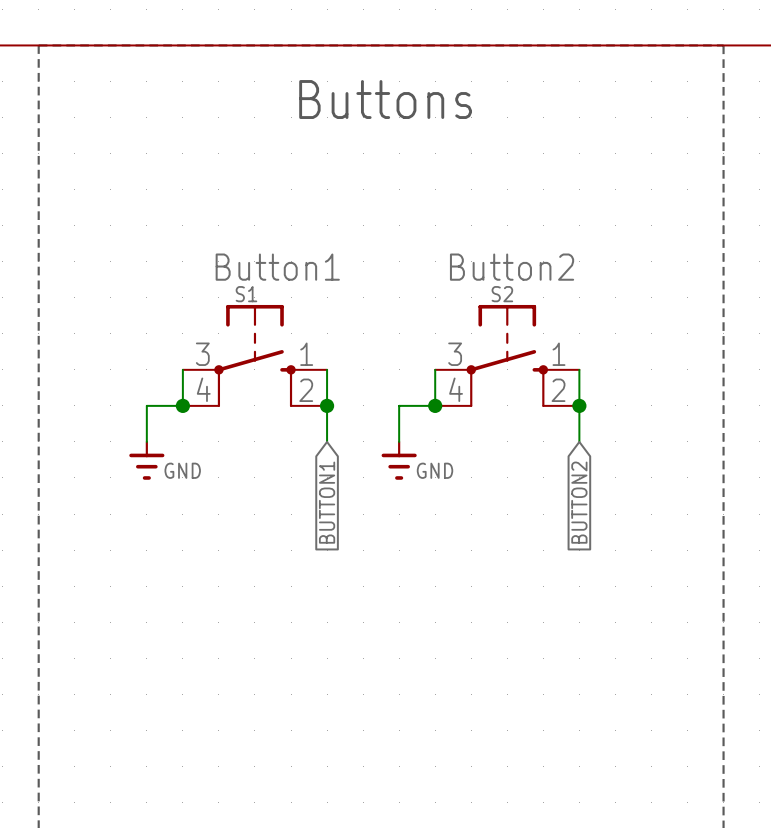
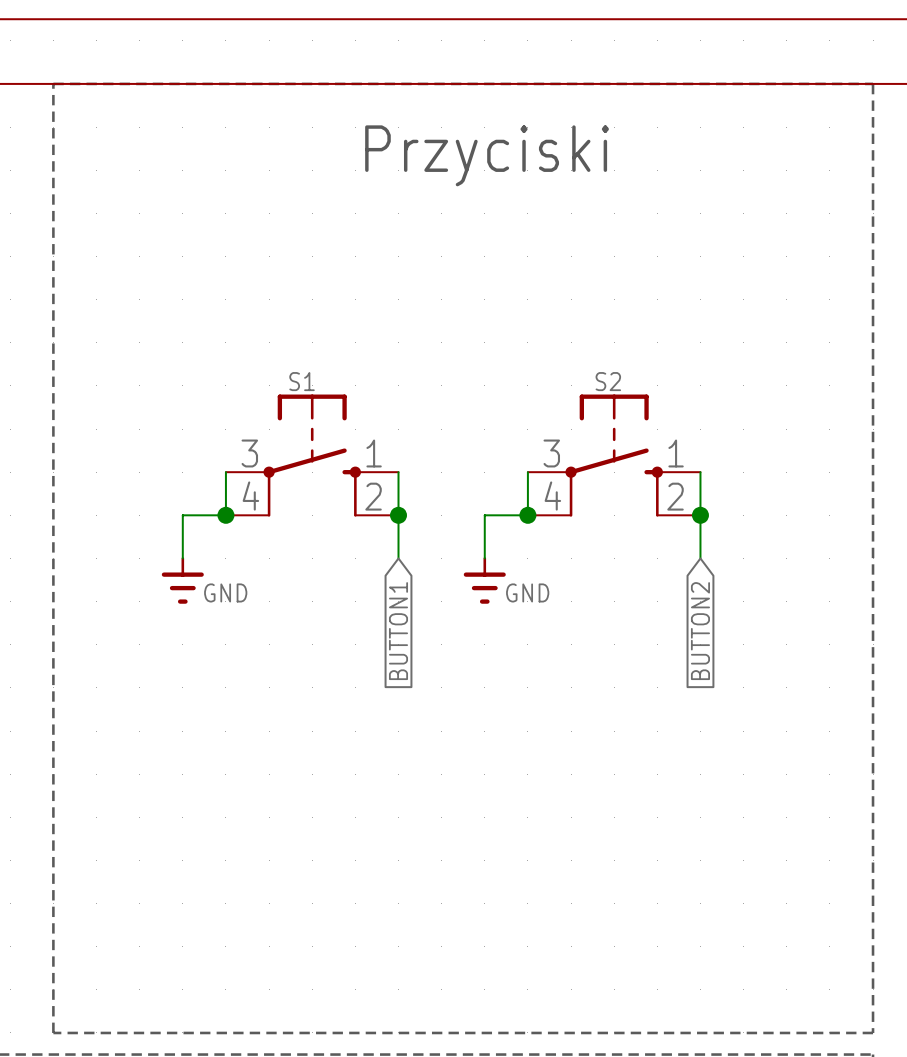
text: Buttons (385, 99) -> Przyciski (487, 155)
S1 value: Button1 (277, 267) -> none
S2 value: Button2 (512, 267) -> none

